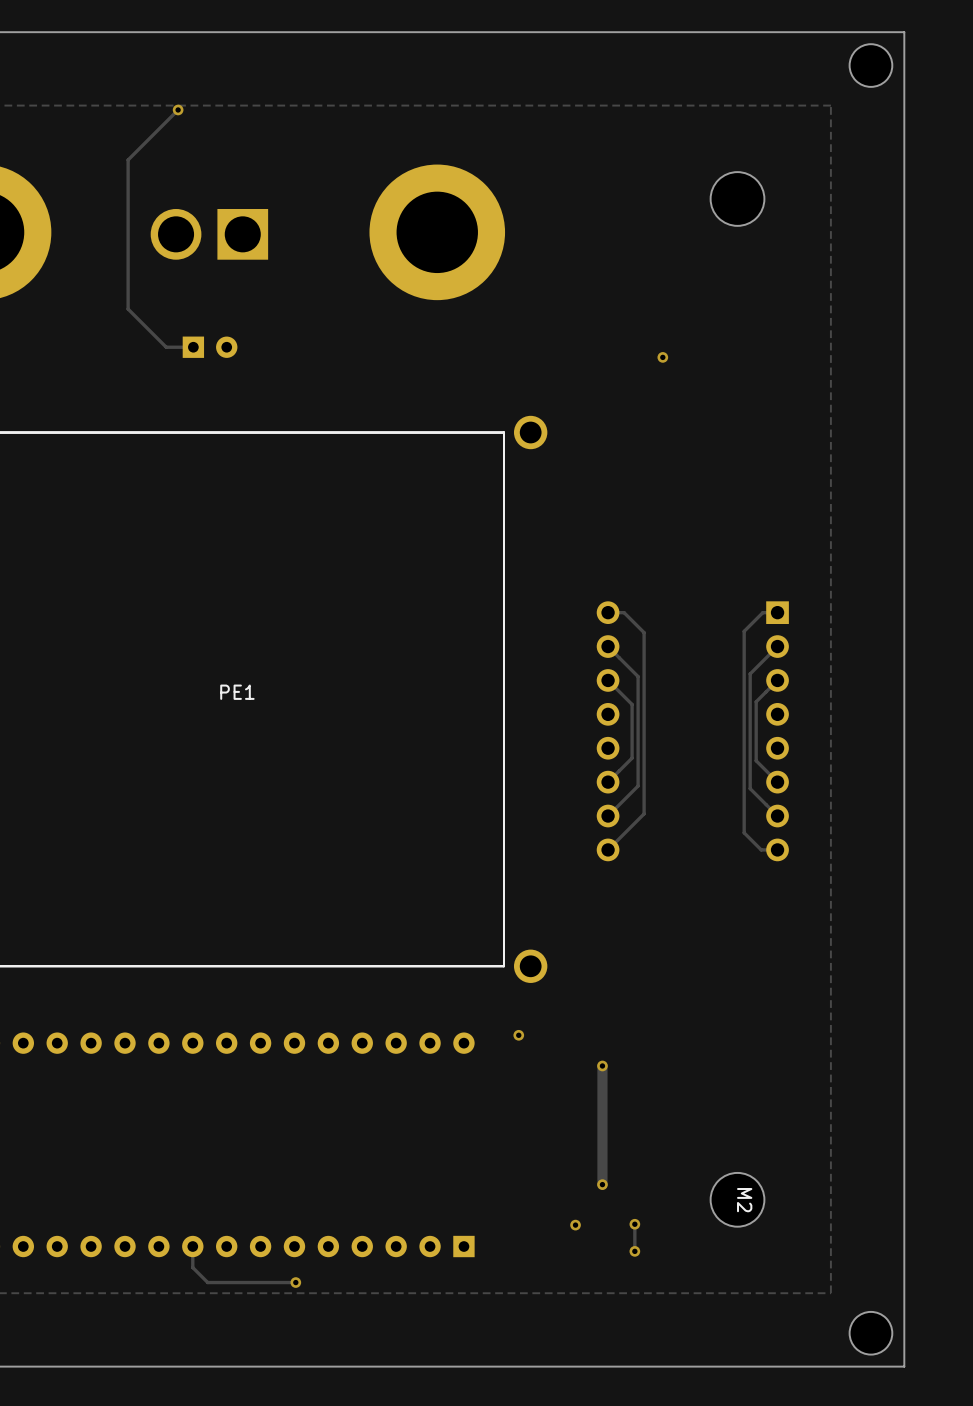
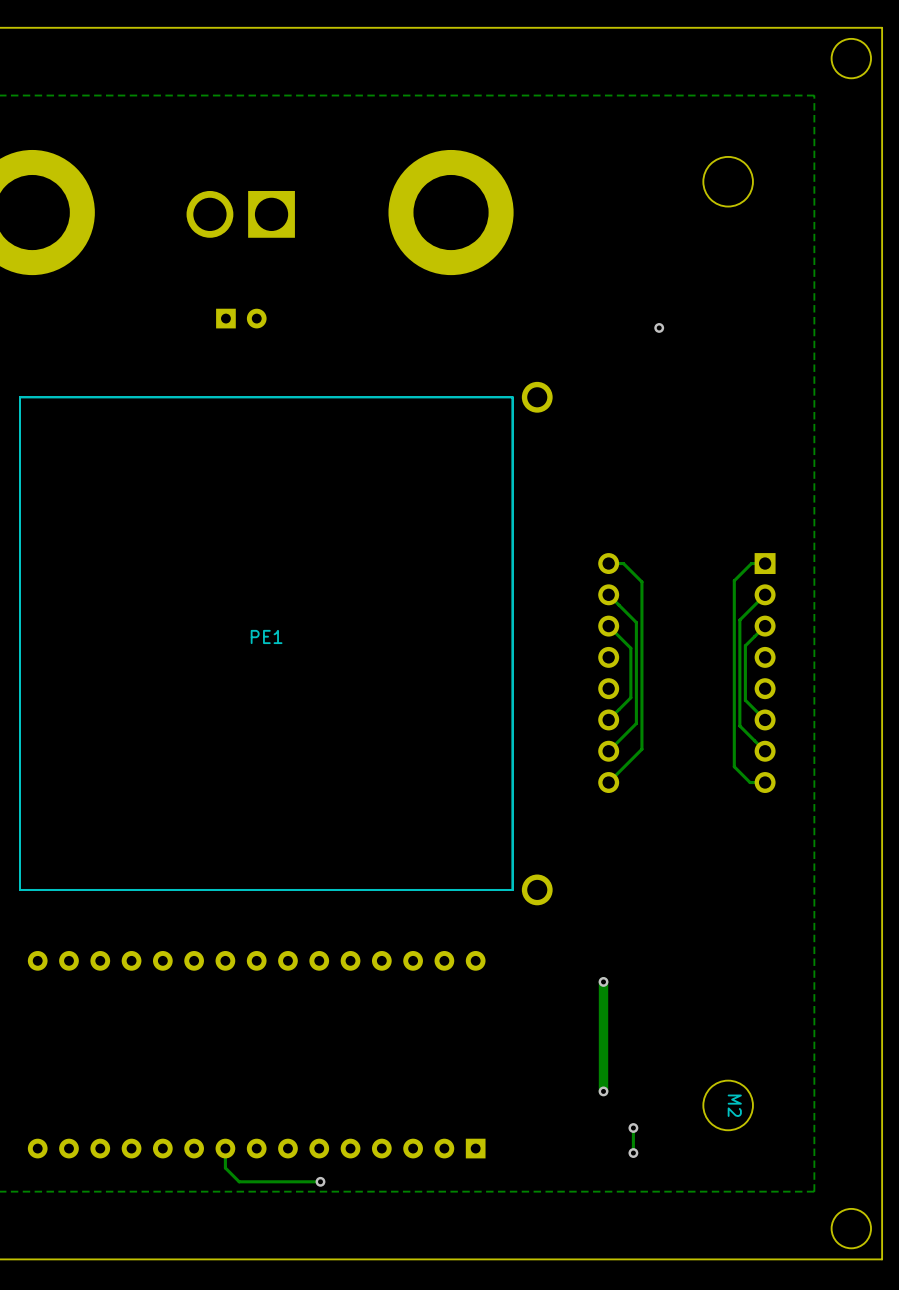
track: (178, 109) (128, 159) (128, 309) (166, 347) (193, 347) -> none
via: (178, 109) -> none
via: (518, 1035) -> none
via: (575, 1225) -> none

